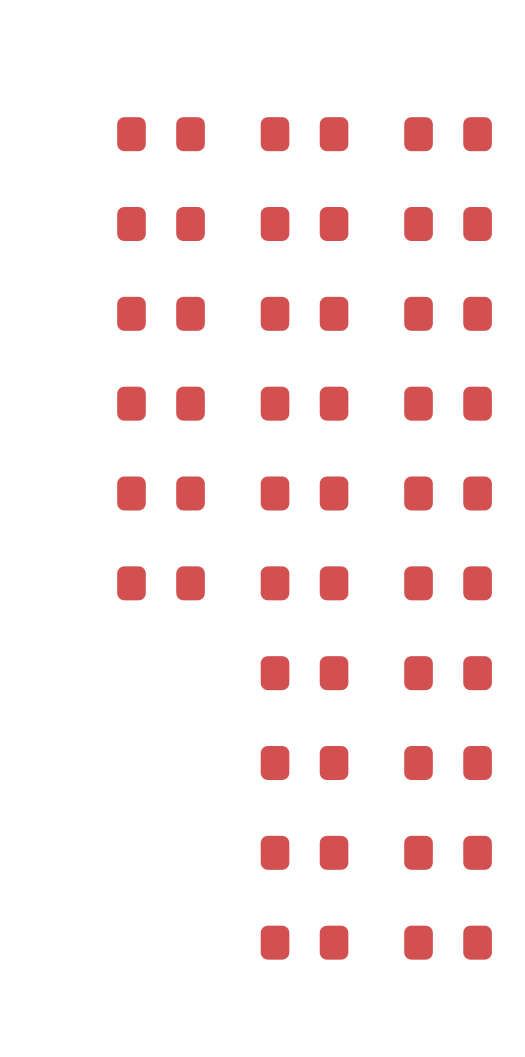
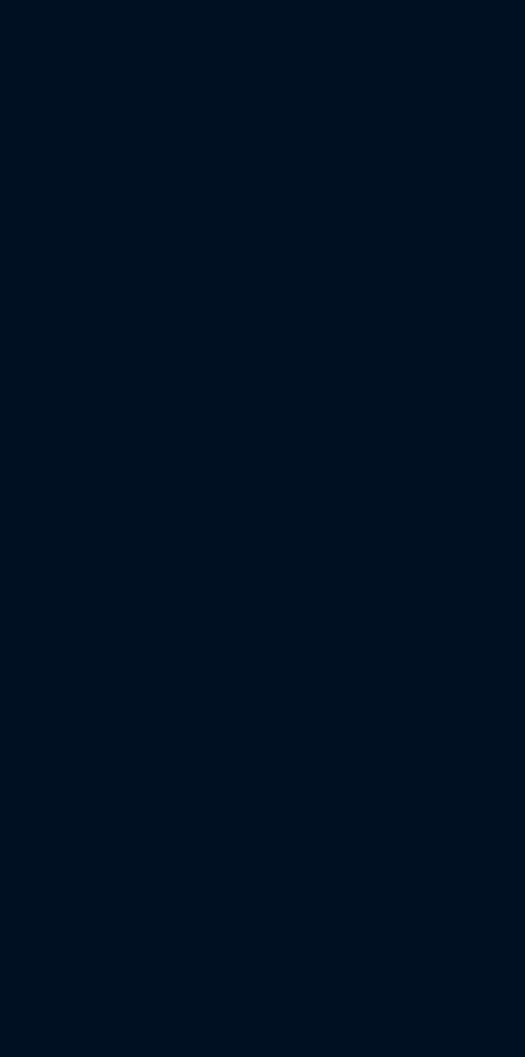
part: (161, 134) -> none
part: (304, 134) -> none
part: (448, 134) -> none
part: (161, 224) -> none
part: (304, 224) -> none
part: (448, 224) -> none
part: (161, 313) -> none
part: (304, 313) -> none
part: (448, 313) -> none
part: (161, 403) -> none
part: (304, 403) -> none
part: (448, 403) -> none
part: (161, 493) -> none
part: (304, 493) -> none
part: (448, 493) -> none
part: (161, 583) -> none
part: (304, 583) -> none
part: (448, 583) -> none
part: (304, 673) -> none
part: (448, 673) -> none
part: (304, 763) -> none
part: (448, 763) -> none
part: (304, 852) -> none
part: (448, 852) -> none
part: (304, 942) -> none
part: (448, 942) -> none

